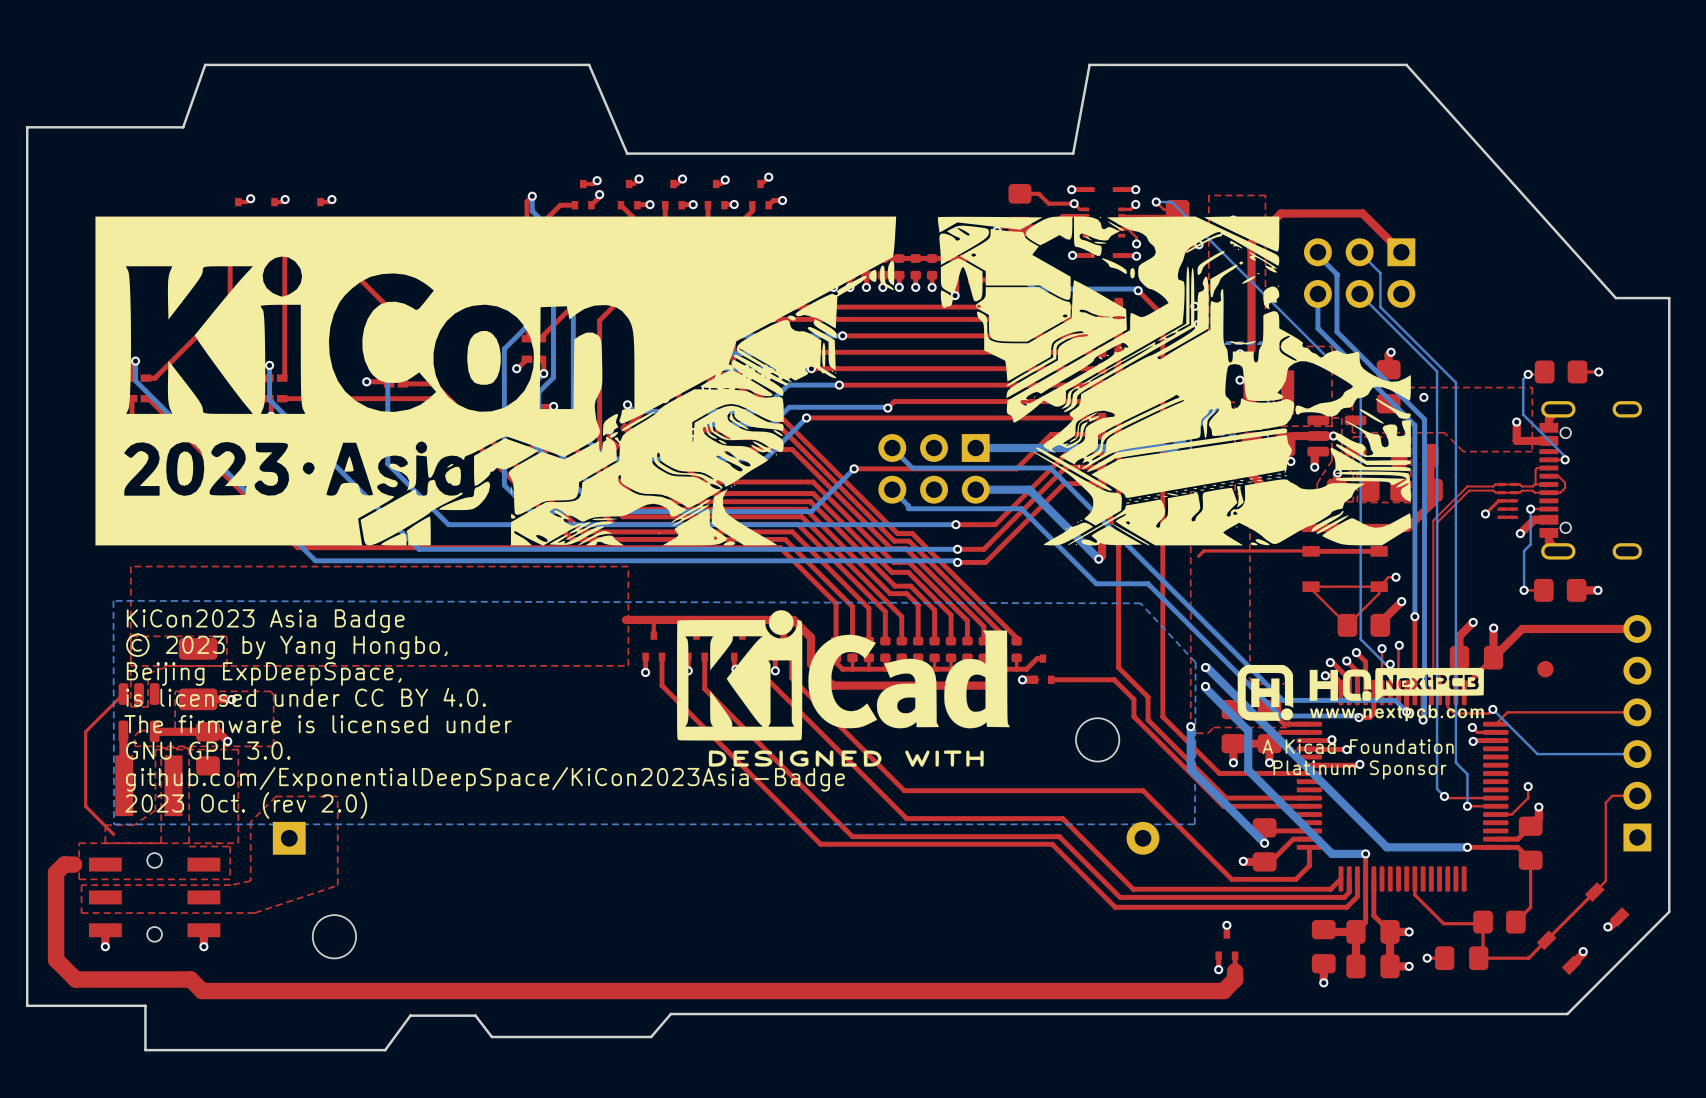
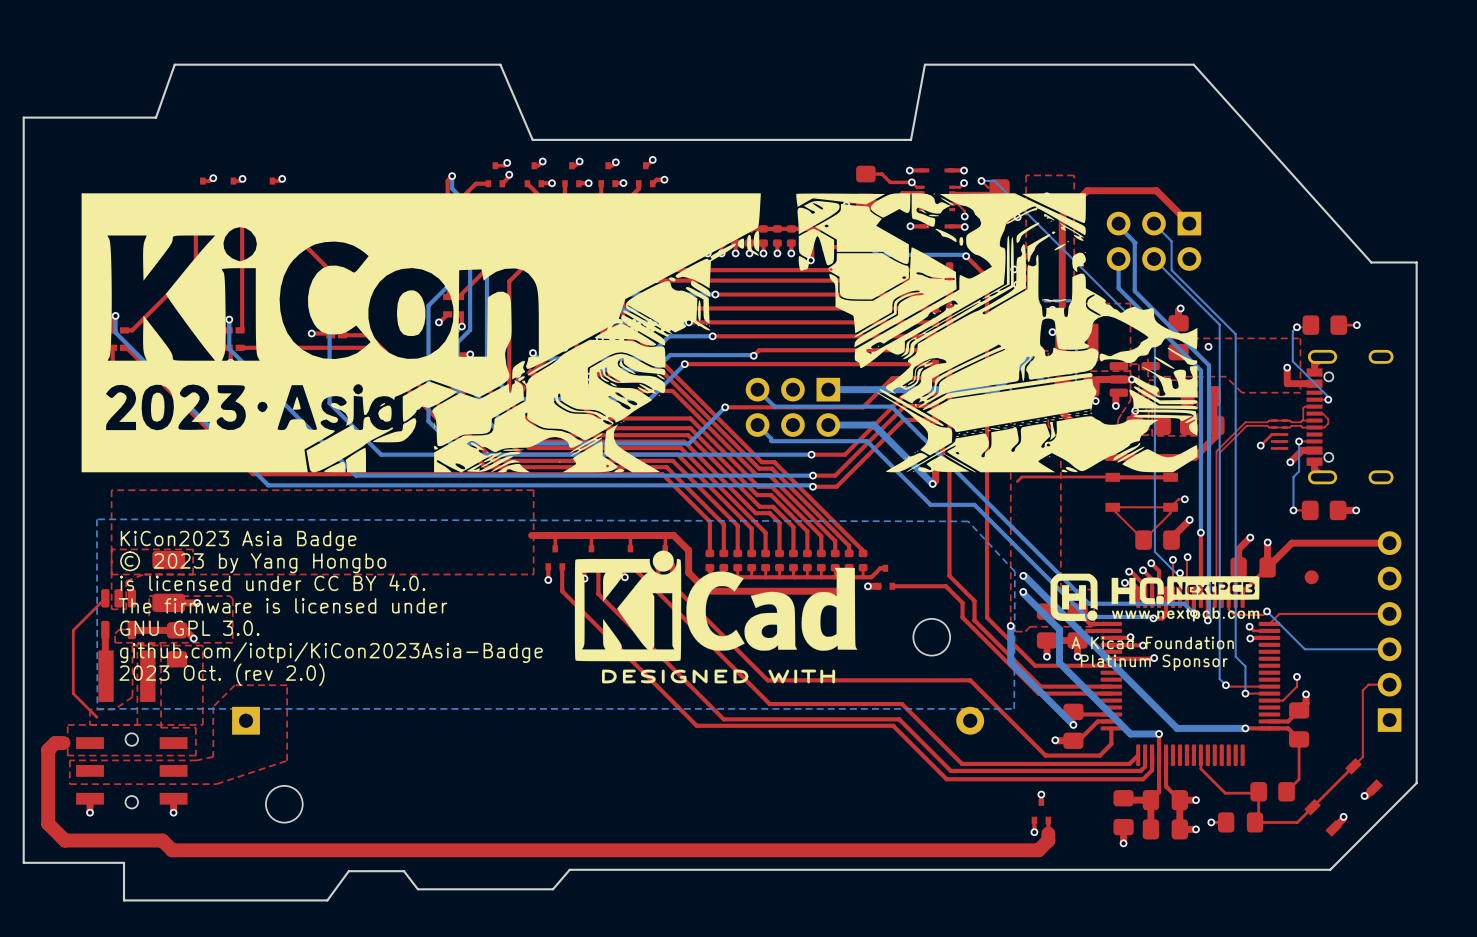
text position: KiCon2023 Asia Badge (265, 621) -> KiCon2023 Asia Badge (238, 540)
text: © 2023 by Yang Hongbo, (286, 646) -> © 2023 by Yang Hongbo (253, 562)
text: Beijing ExpDeepSpace, (264, 674) -> none
drawing position: (843, 688) -> (716, 616)
text position: is licensed under CC BY 4.0. (305, 697) -> is licensed under CC BY 4.0. (272, 583)
text position: The firmware is licensed under (318, 724) -> The firmware is licensed under (283, 605)
text position: GNU GPL 3.0. (208, 750) -> GNU GPL 3.0. (189, 628)
text: github.com/ExponentialDeepSpace/KiCon2023Asia-Badge (485, 779) -> github.com/iotpi/KiCon2023Asia-Badge (331, 652)
text position: 2023 Oct. (rev 2.0) (246, 805) -> 2023 Oct. (rev 2.0) (221, 674)

